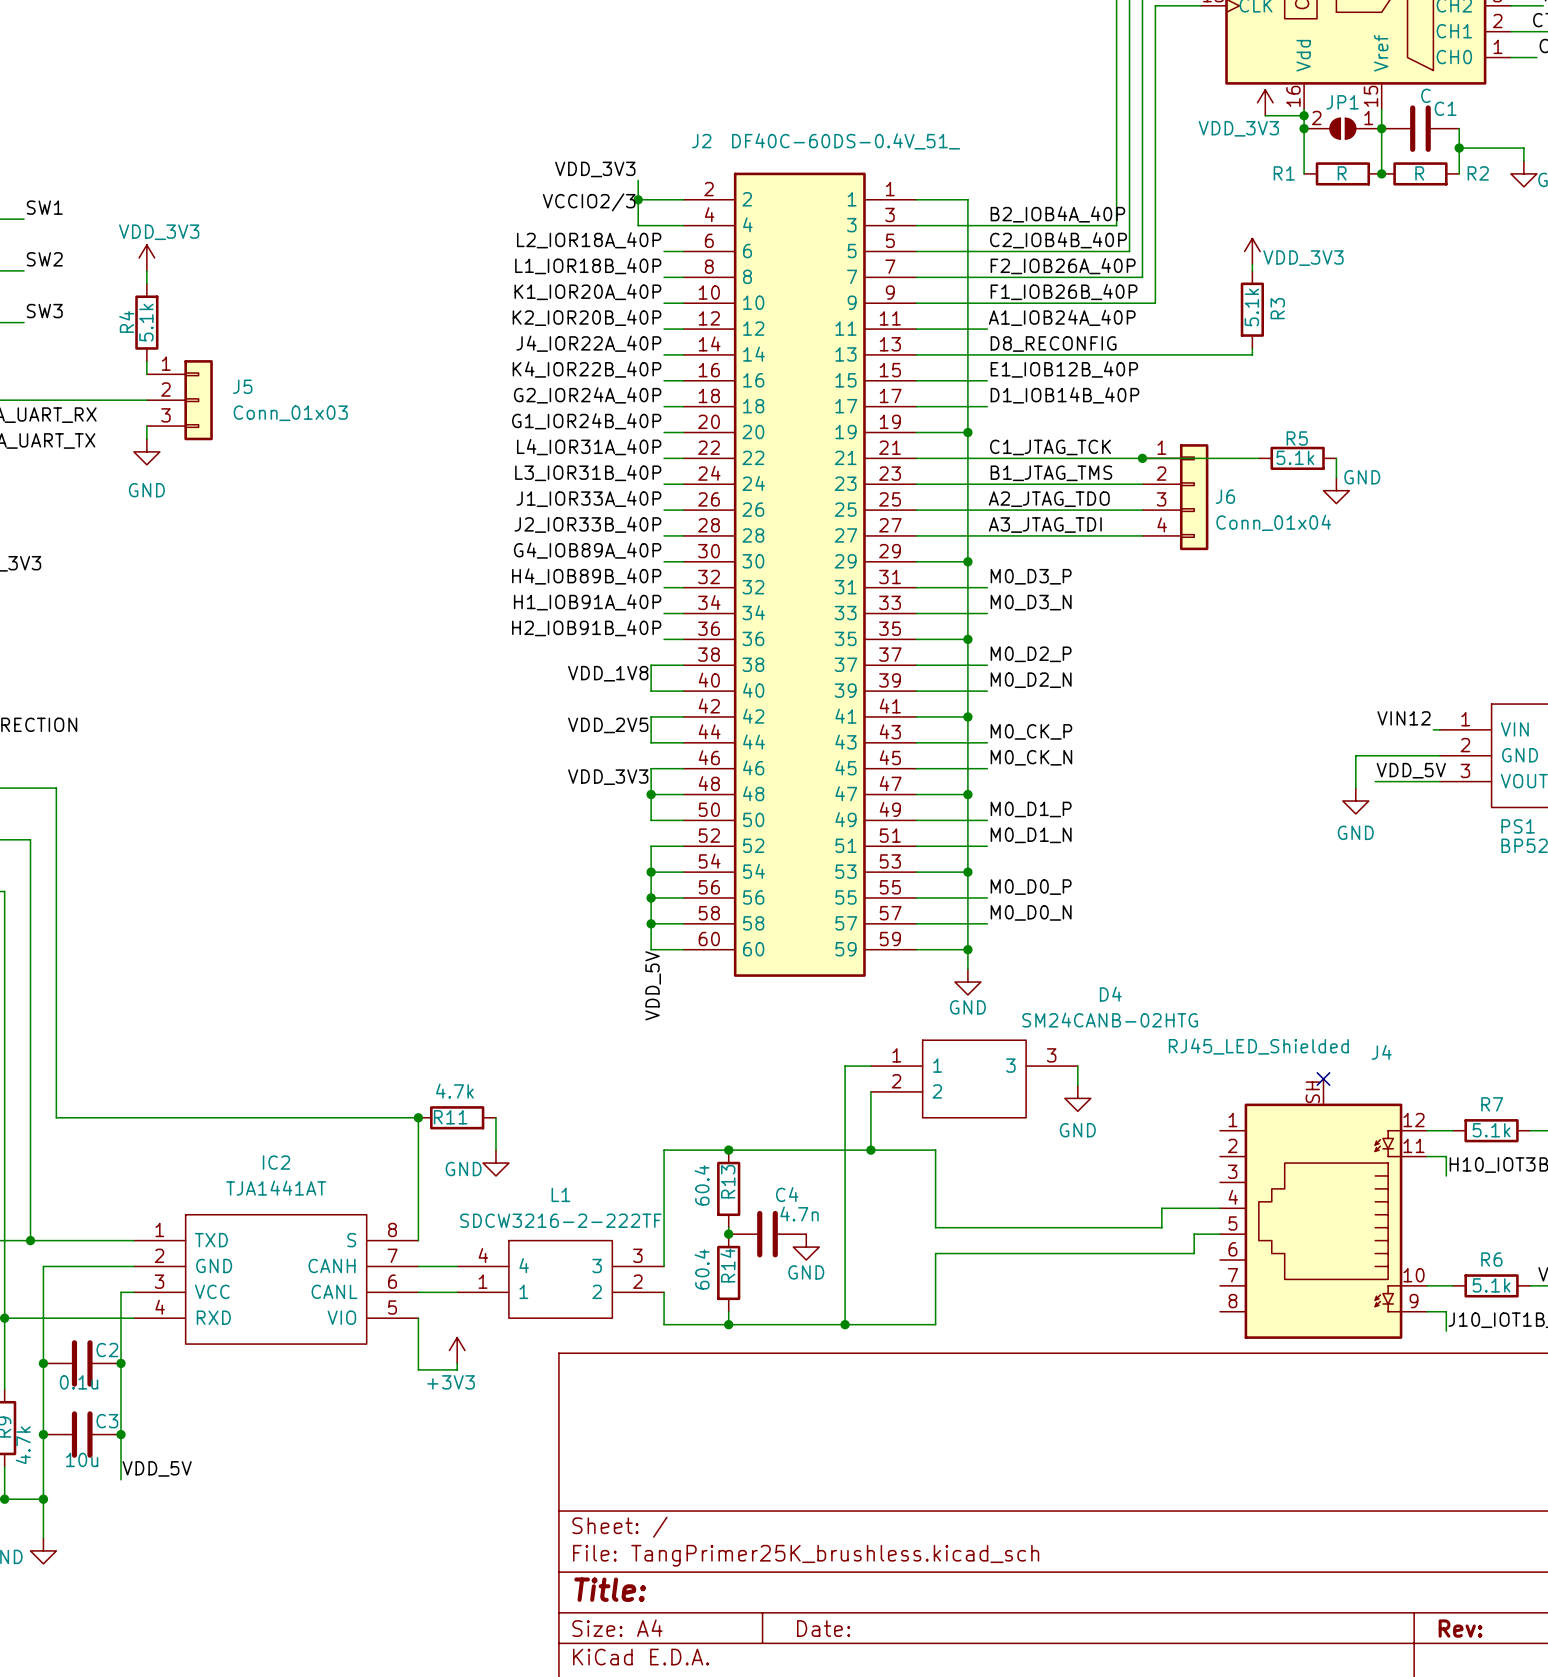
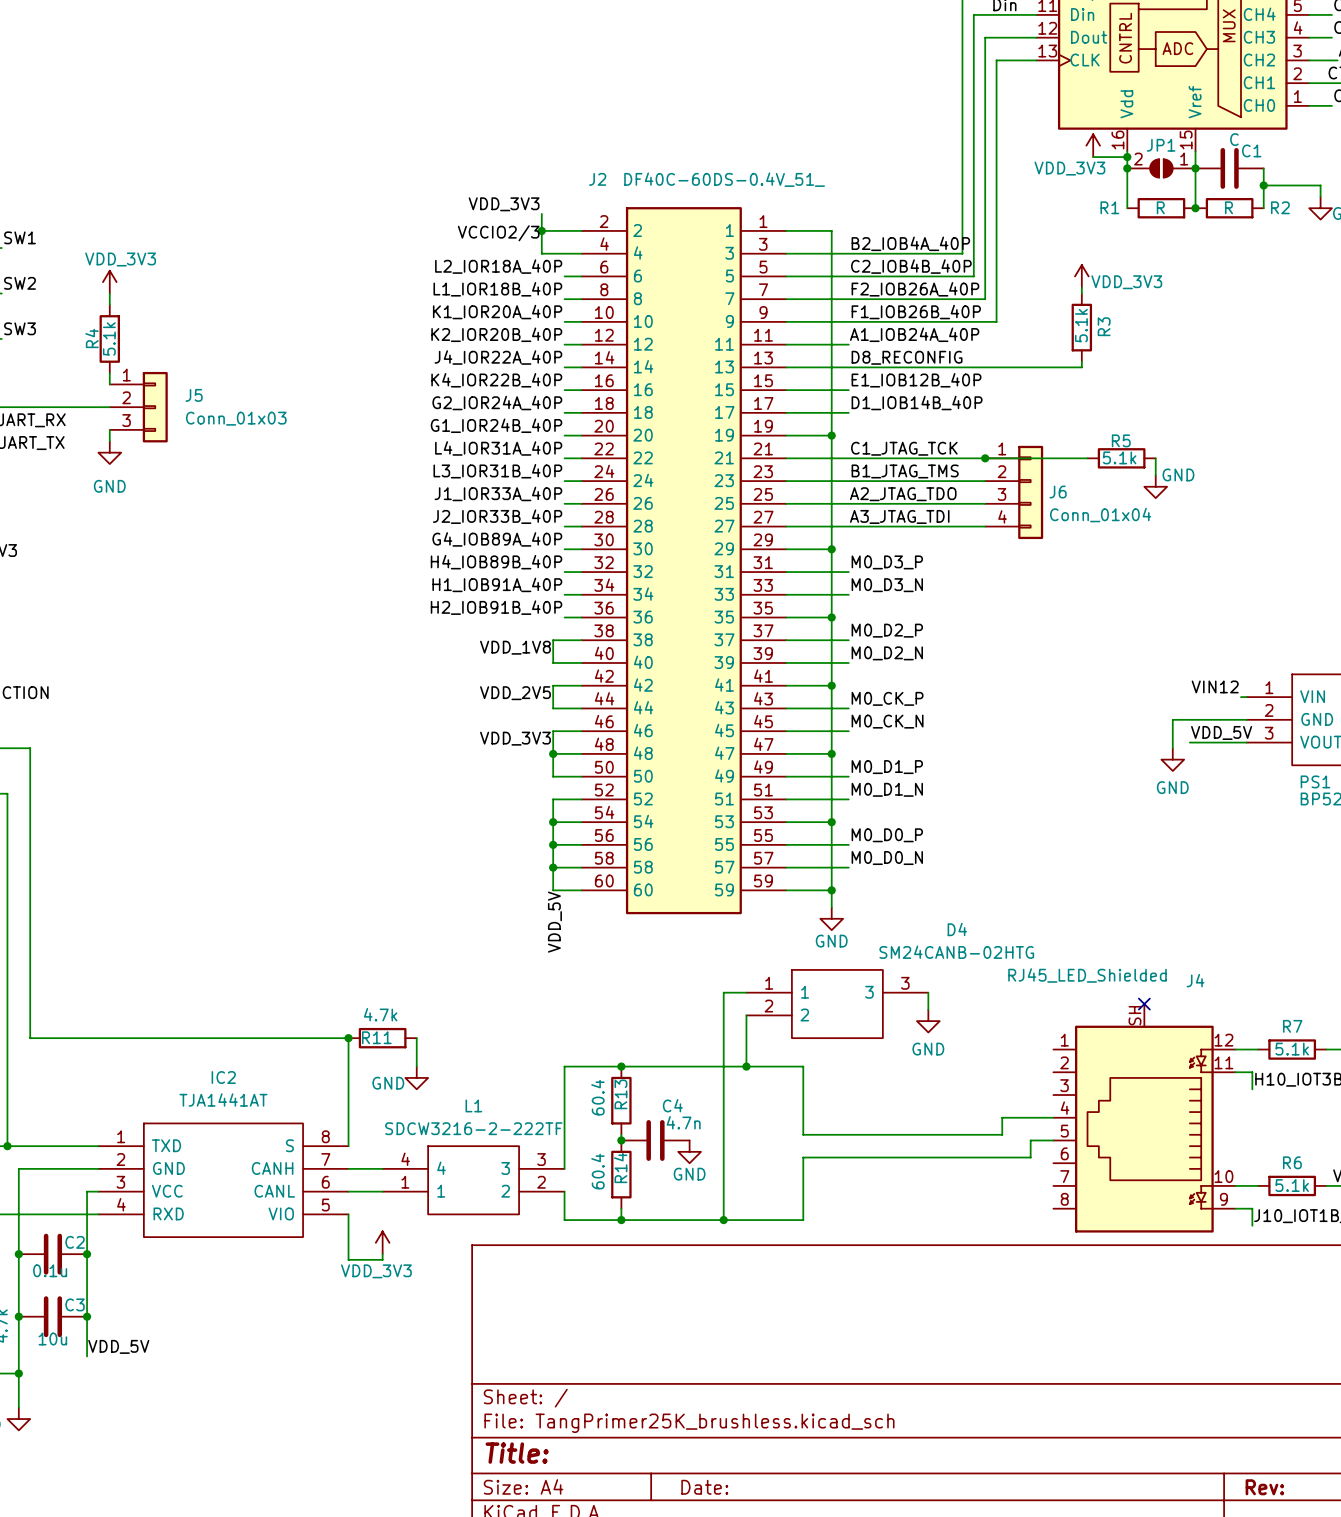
power symbol: +3V3 (457, 1350) -> VDD_3V3 (382, 1242)

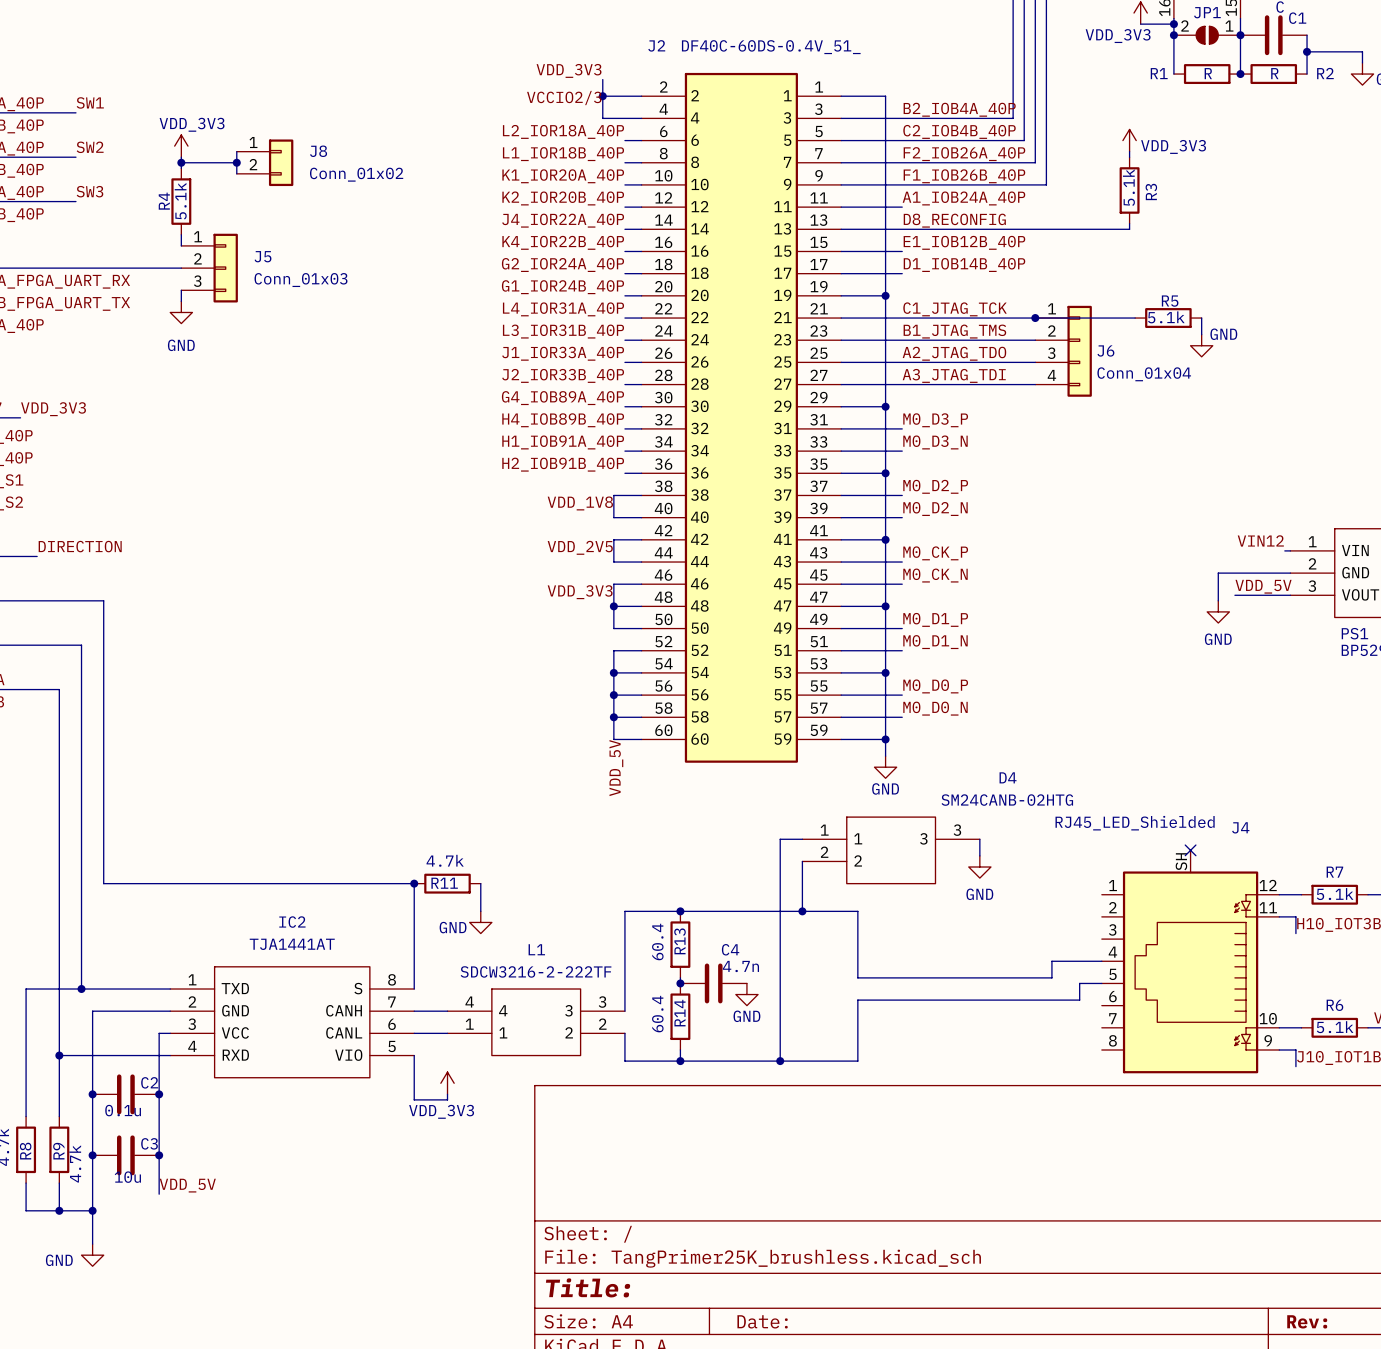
wire: none -> (236, 151) (236, 173)
wire: none -> (181, 162) (236, 162)
junction: none -> (181, 162)
junction: none -> (236, 162)
J8: none -> Conn_01x02 (265, 162)

